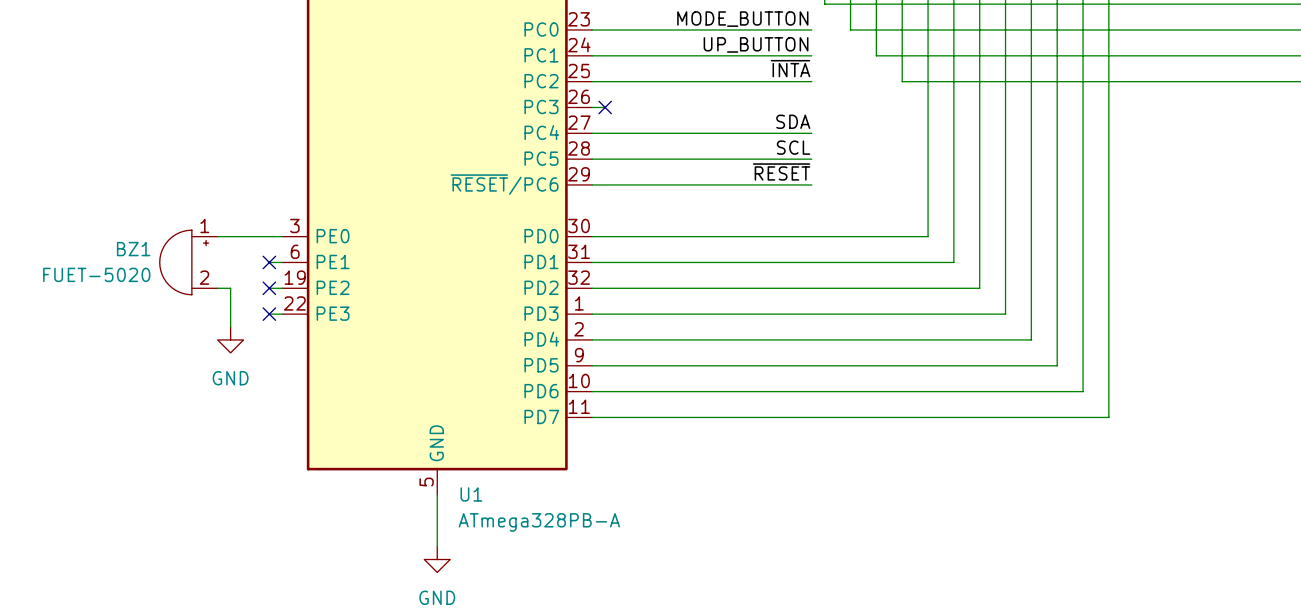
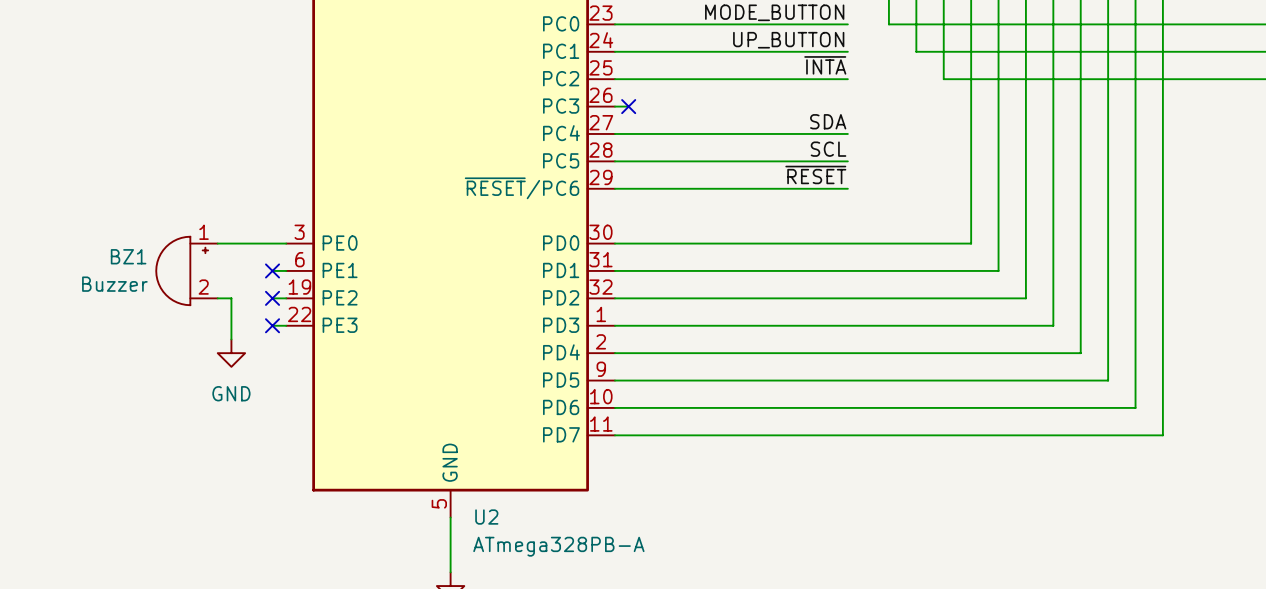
BZ1 value: FUET-5020 (96, 274) -> Buzzer (114, 284)
U1 name: U1 (471, 494) -> U2 (486, 517)

